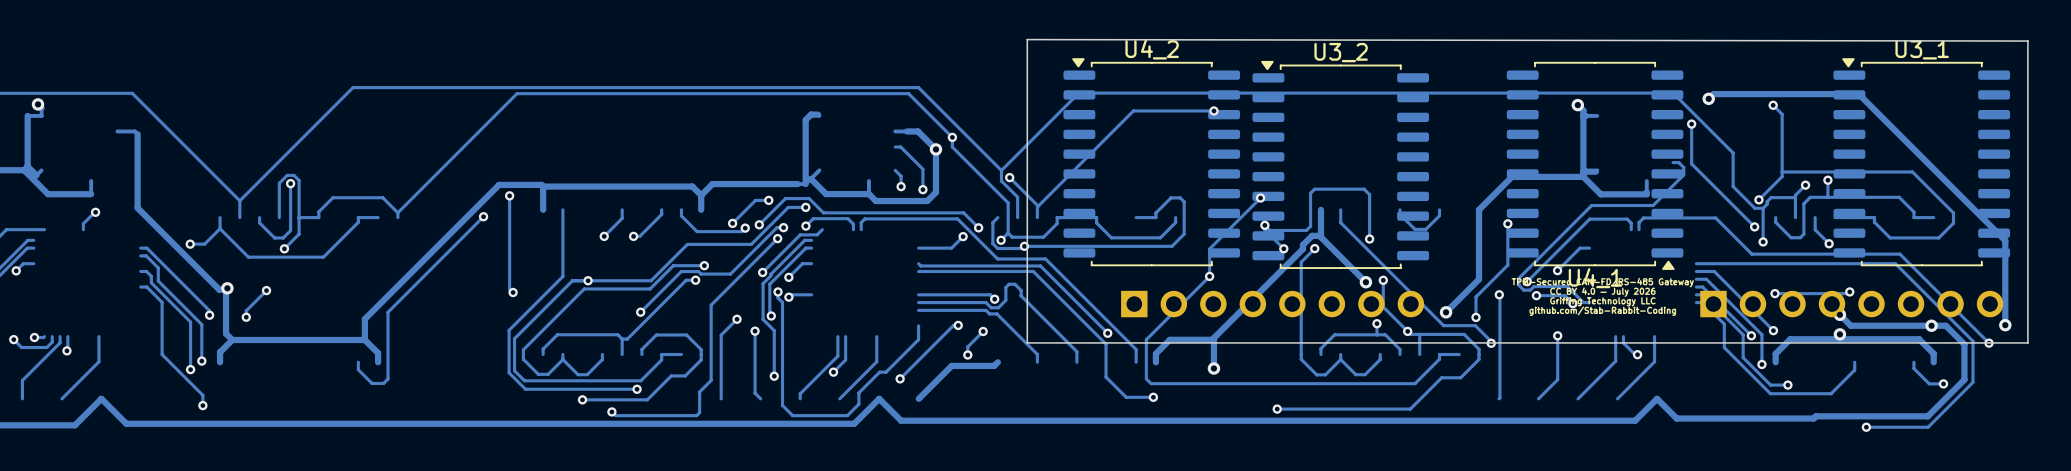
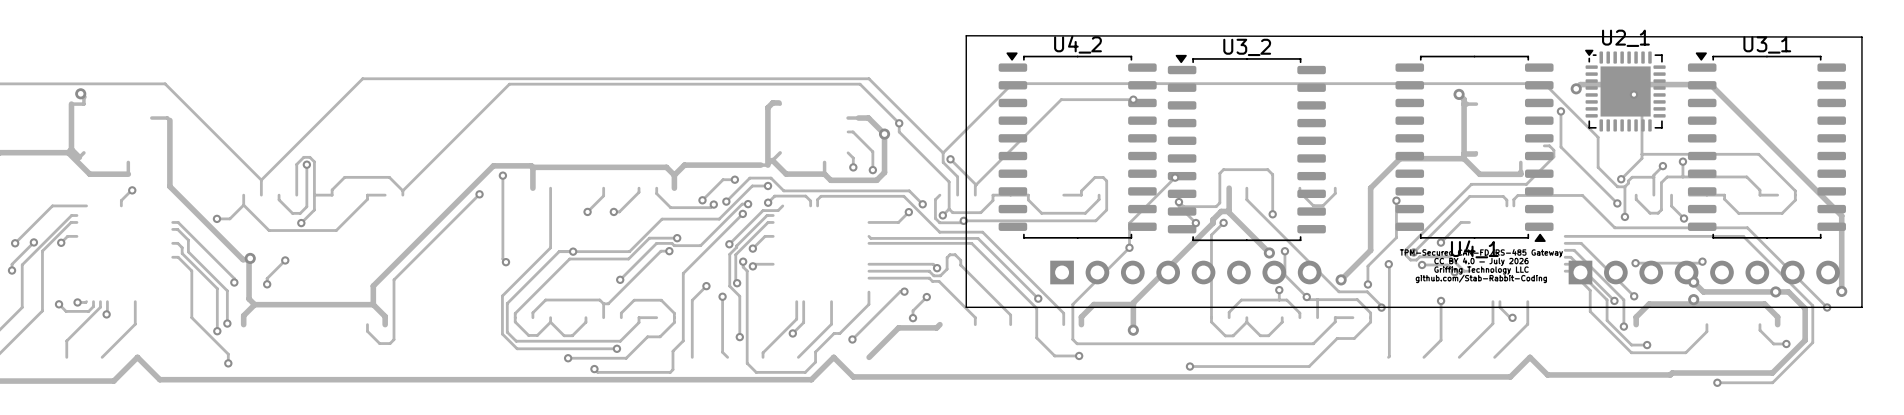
U2_1: none -> (1625, 90)

